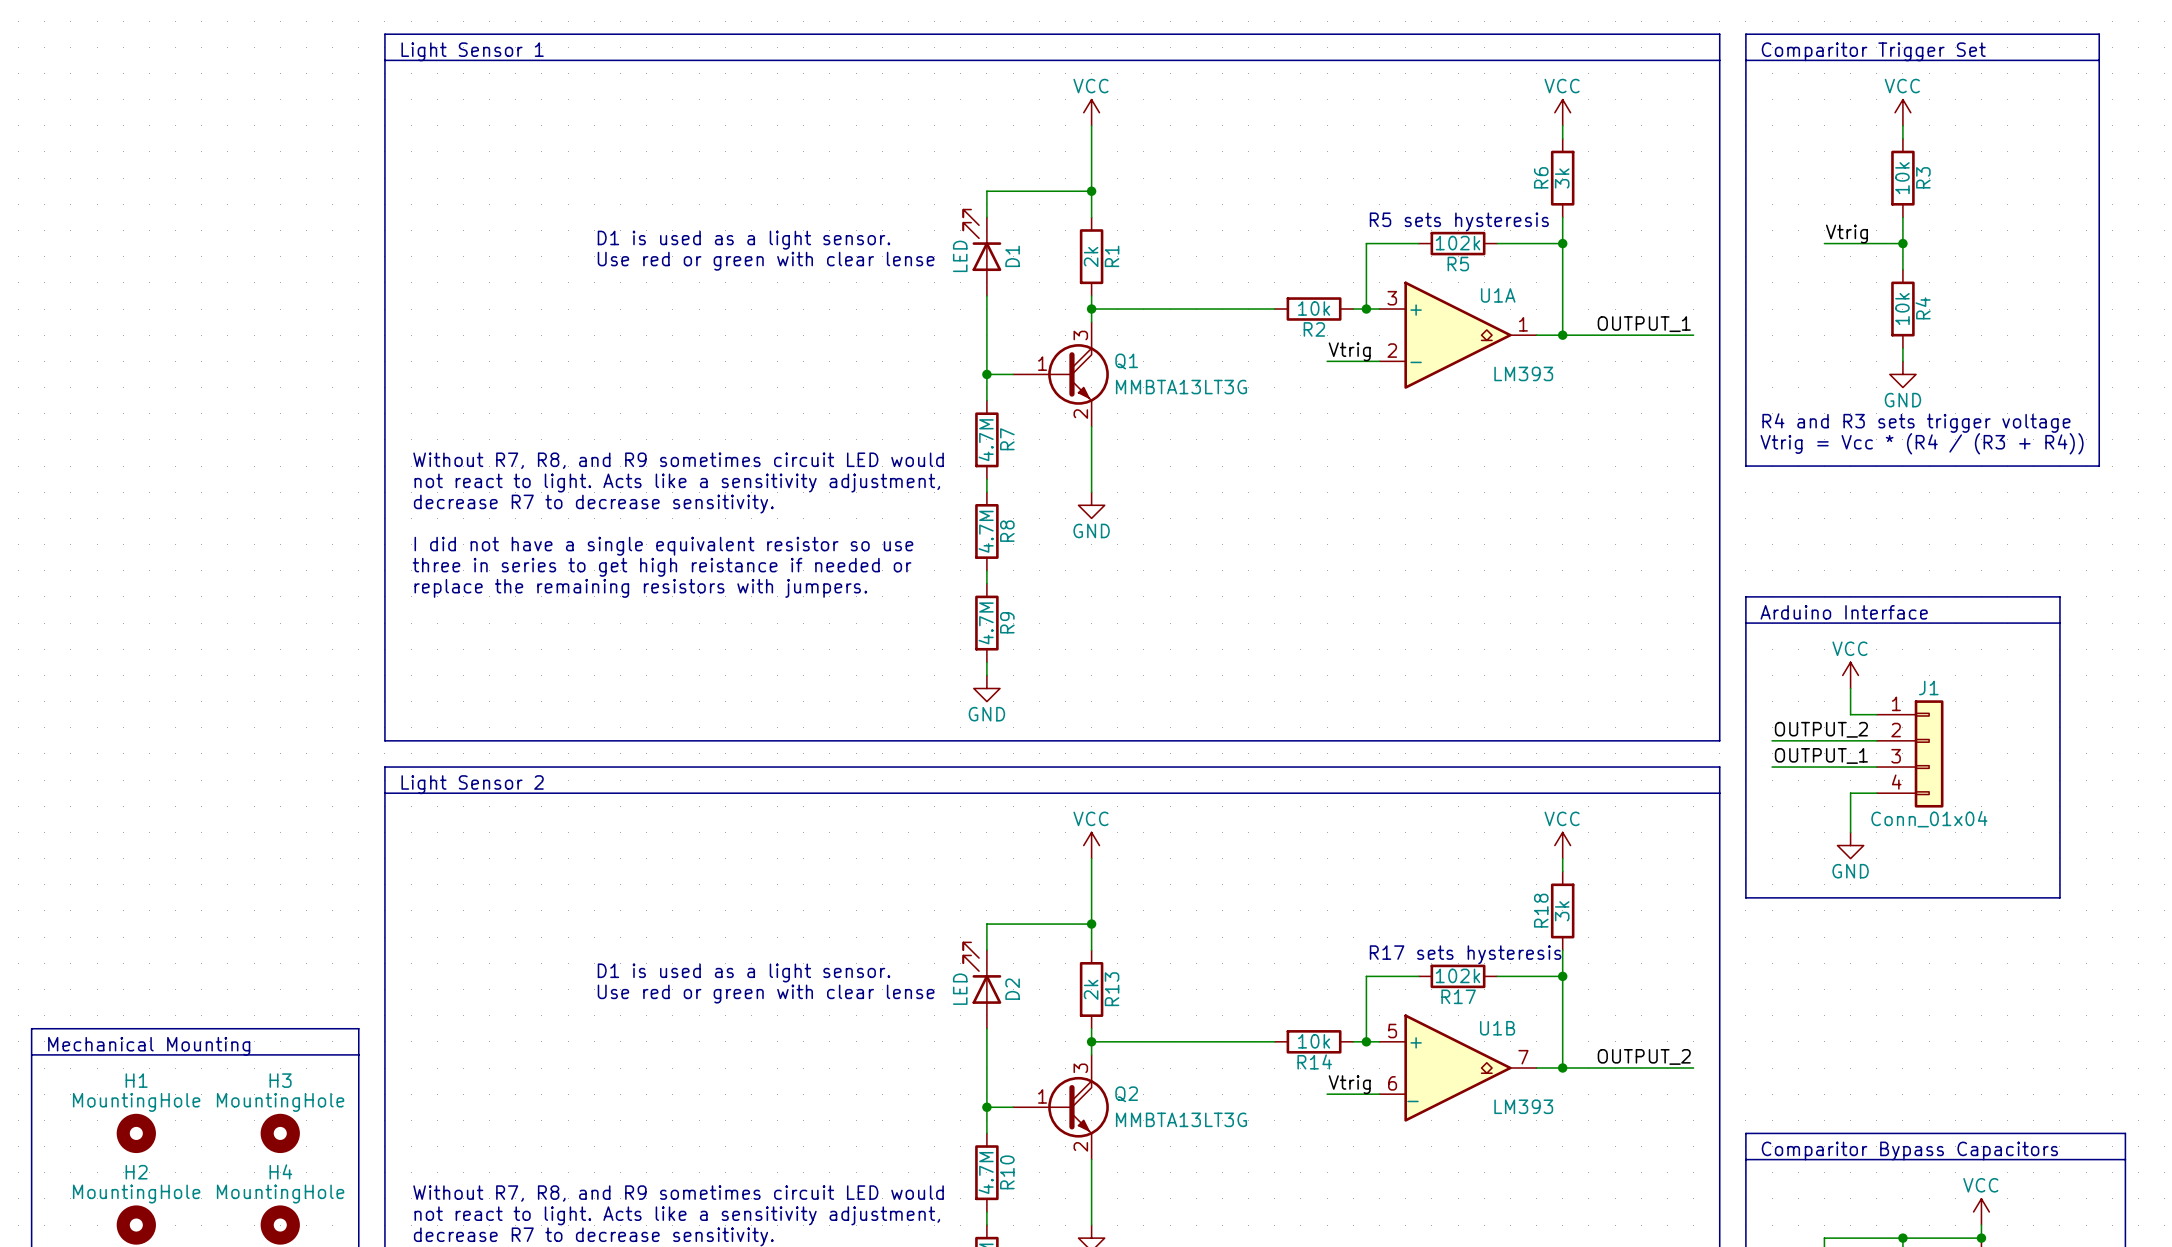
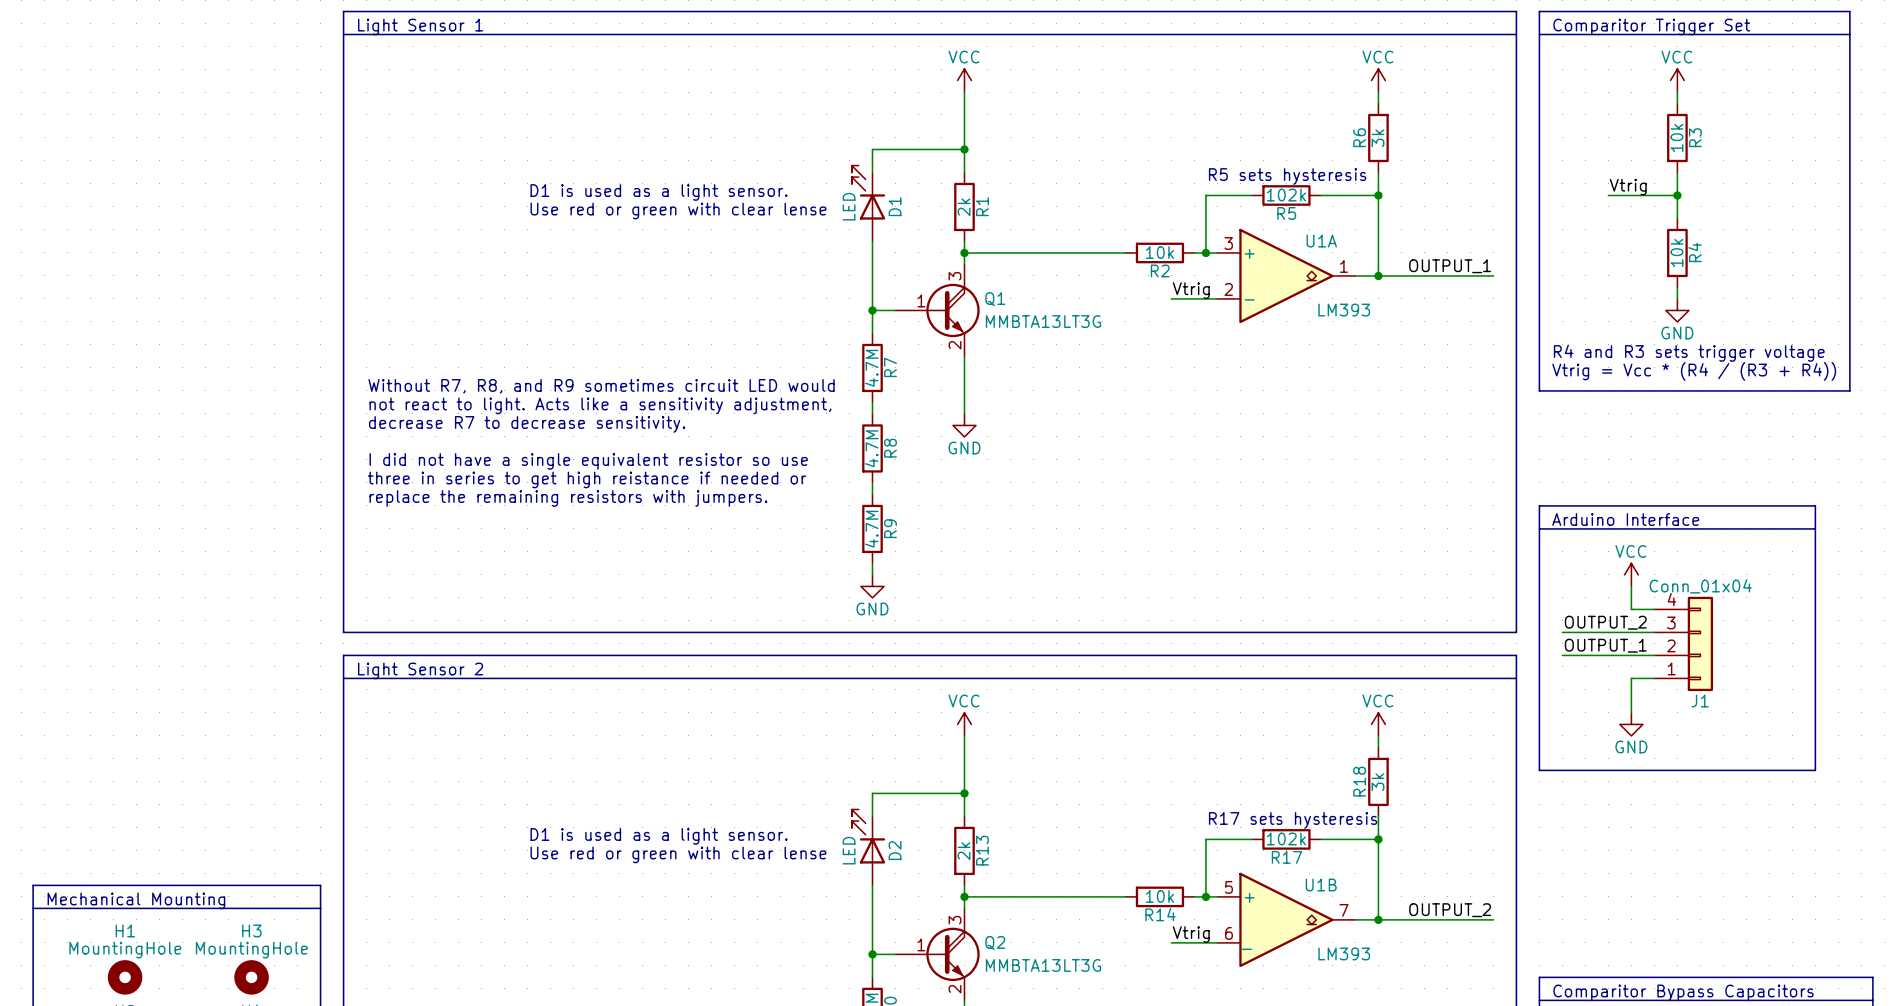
J1 flip: as is (1929, 753) -> up-down (1700, 643)

